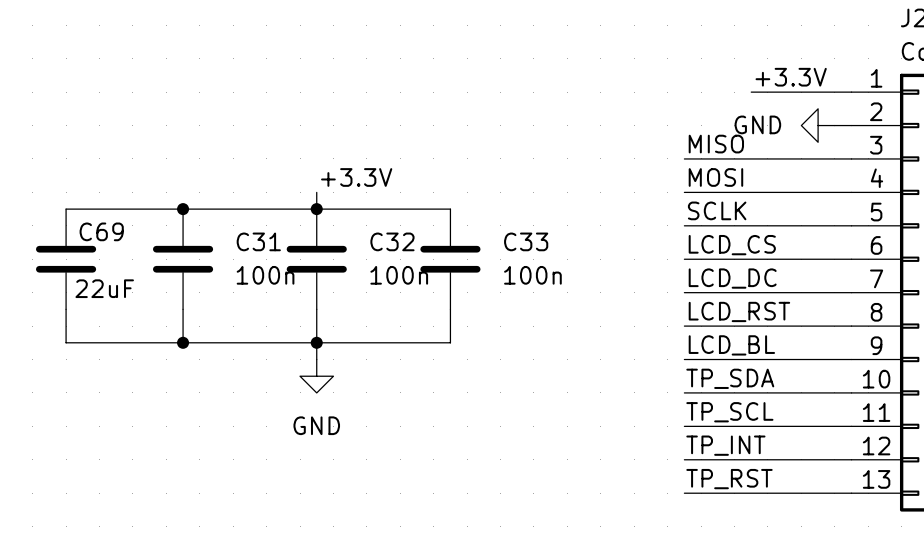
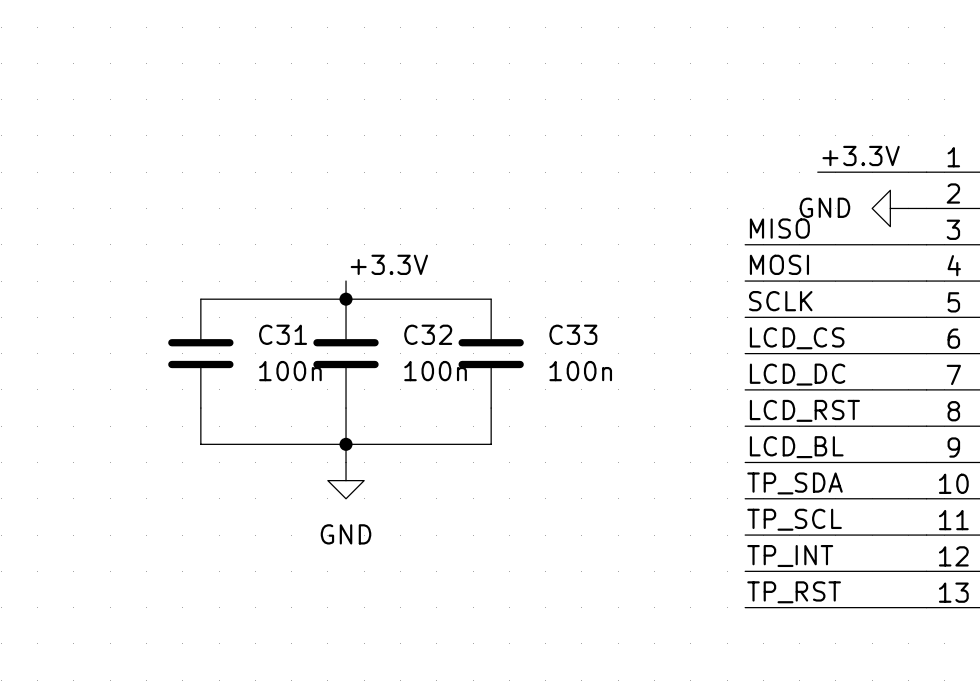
wire: (66, 209) (183, 209) -> none
junction: (183, 209) -> none
C69: 22uF (66, 259) -> none
wire: (66, 309) (66, 342) (183, 342) -> none
junction: (183, 342) -> none

